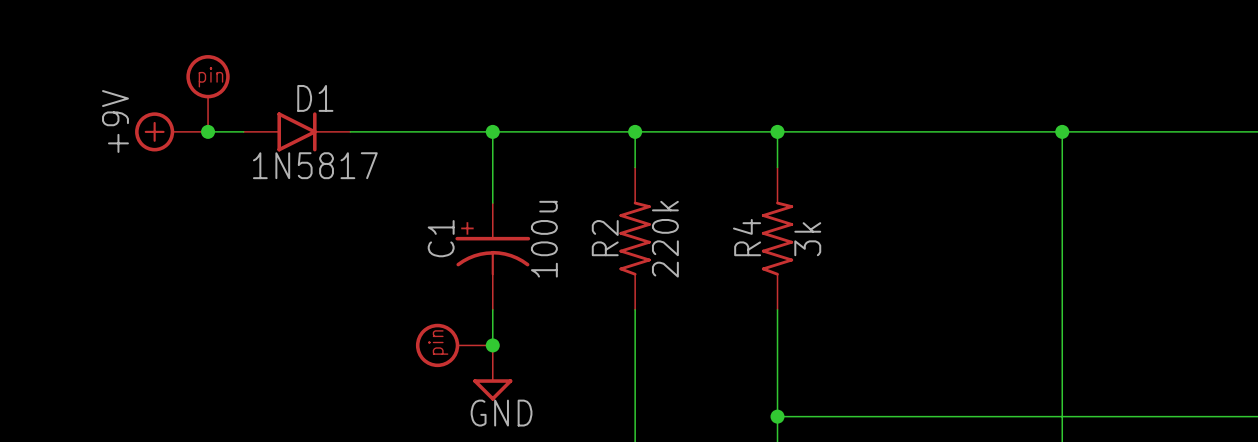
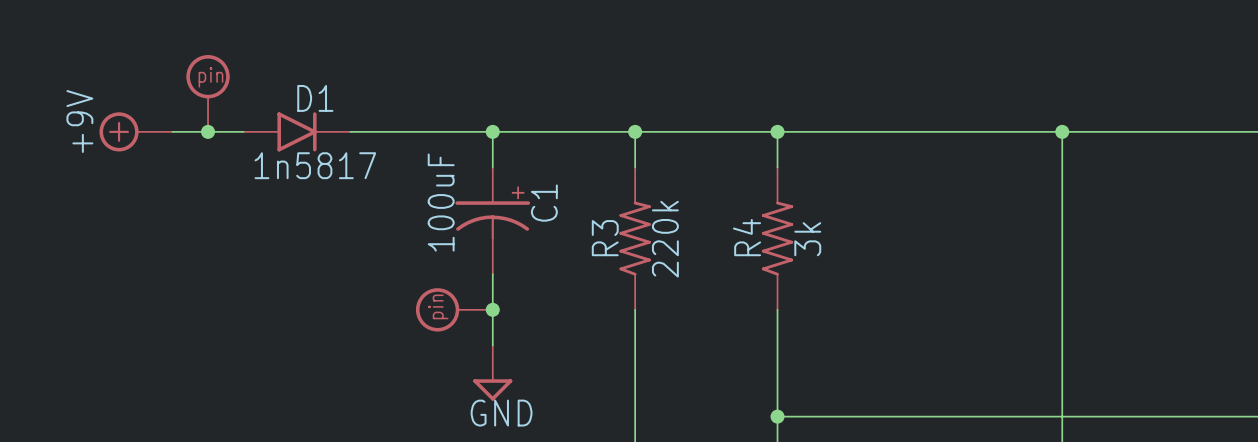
power symbol position: +9V (171, 131) -> +9V (135, 131)
D1 value: 1N5817 (315, 165) -> 1n5817 (315, 165)
R2 name: R2 (605, 238) -> R3 (605, 238)
C1 value: 100u (544, 239) -> 100uF (441, 202)
C1 flip: as is (492, 248) -> left-right (492, 213)
part position: (454, 345) -> (454, 309)
junction position: (492, 345) -> (492, 309)

